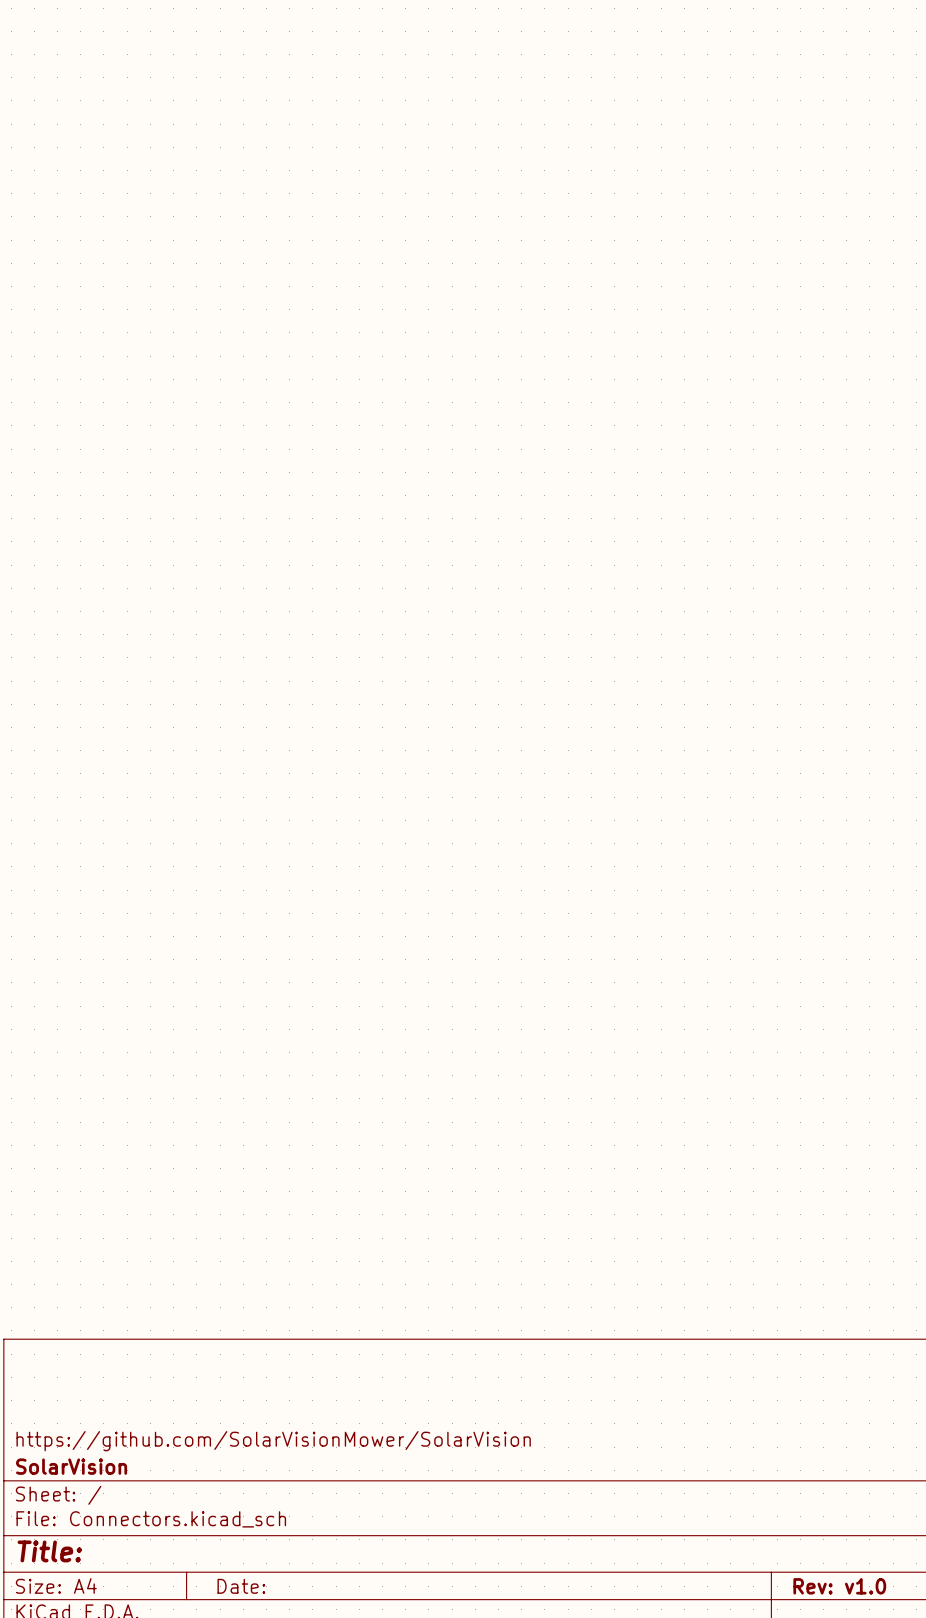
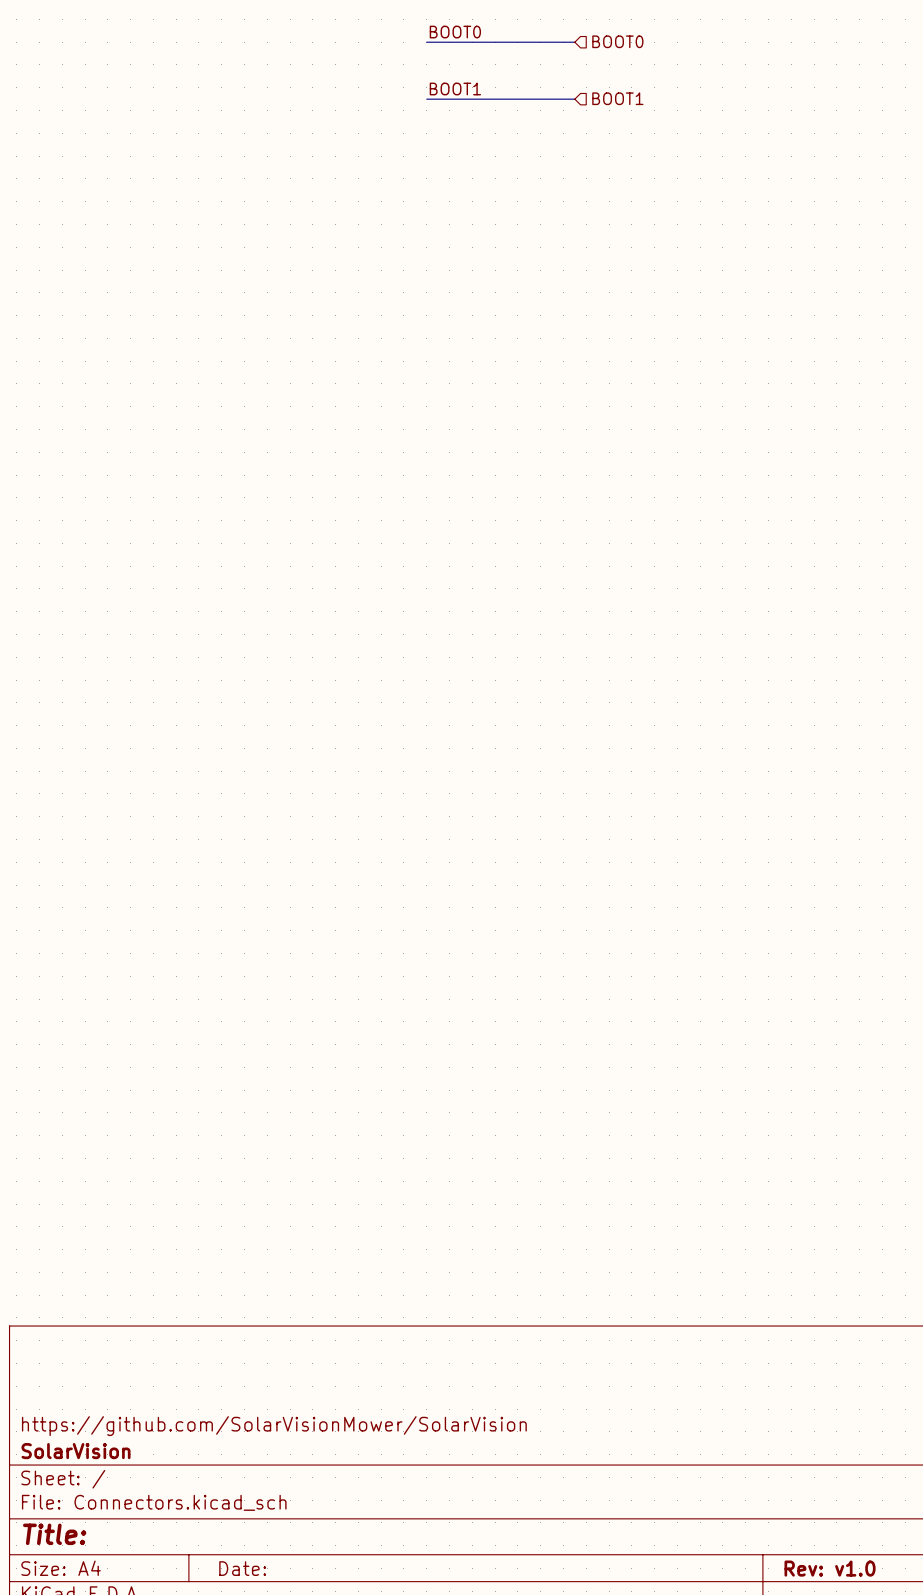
label: none -> BOOT0 (455, 32)
hierarchical label: none -> BOOT0 (617, 41)
wire: none -> (426, 42) (574, 42)
label: none -> BOOT1 (455, 89)
hierarchical label: none -> BOOT1 (617, 98)
wire: none -> (426, 99) (574, 99)

